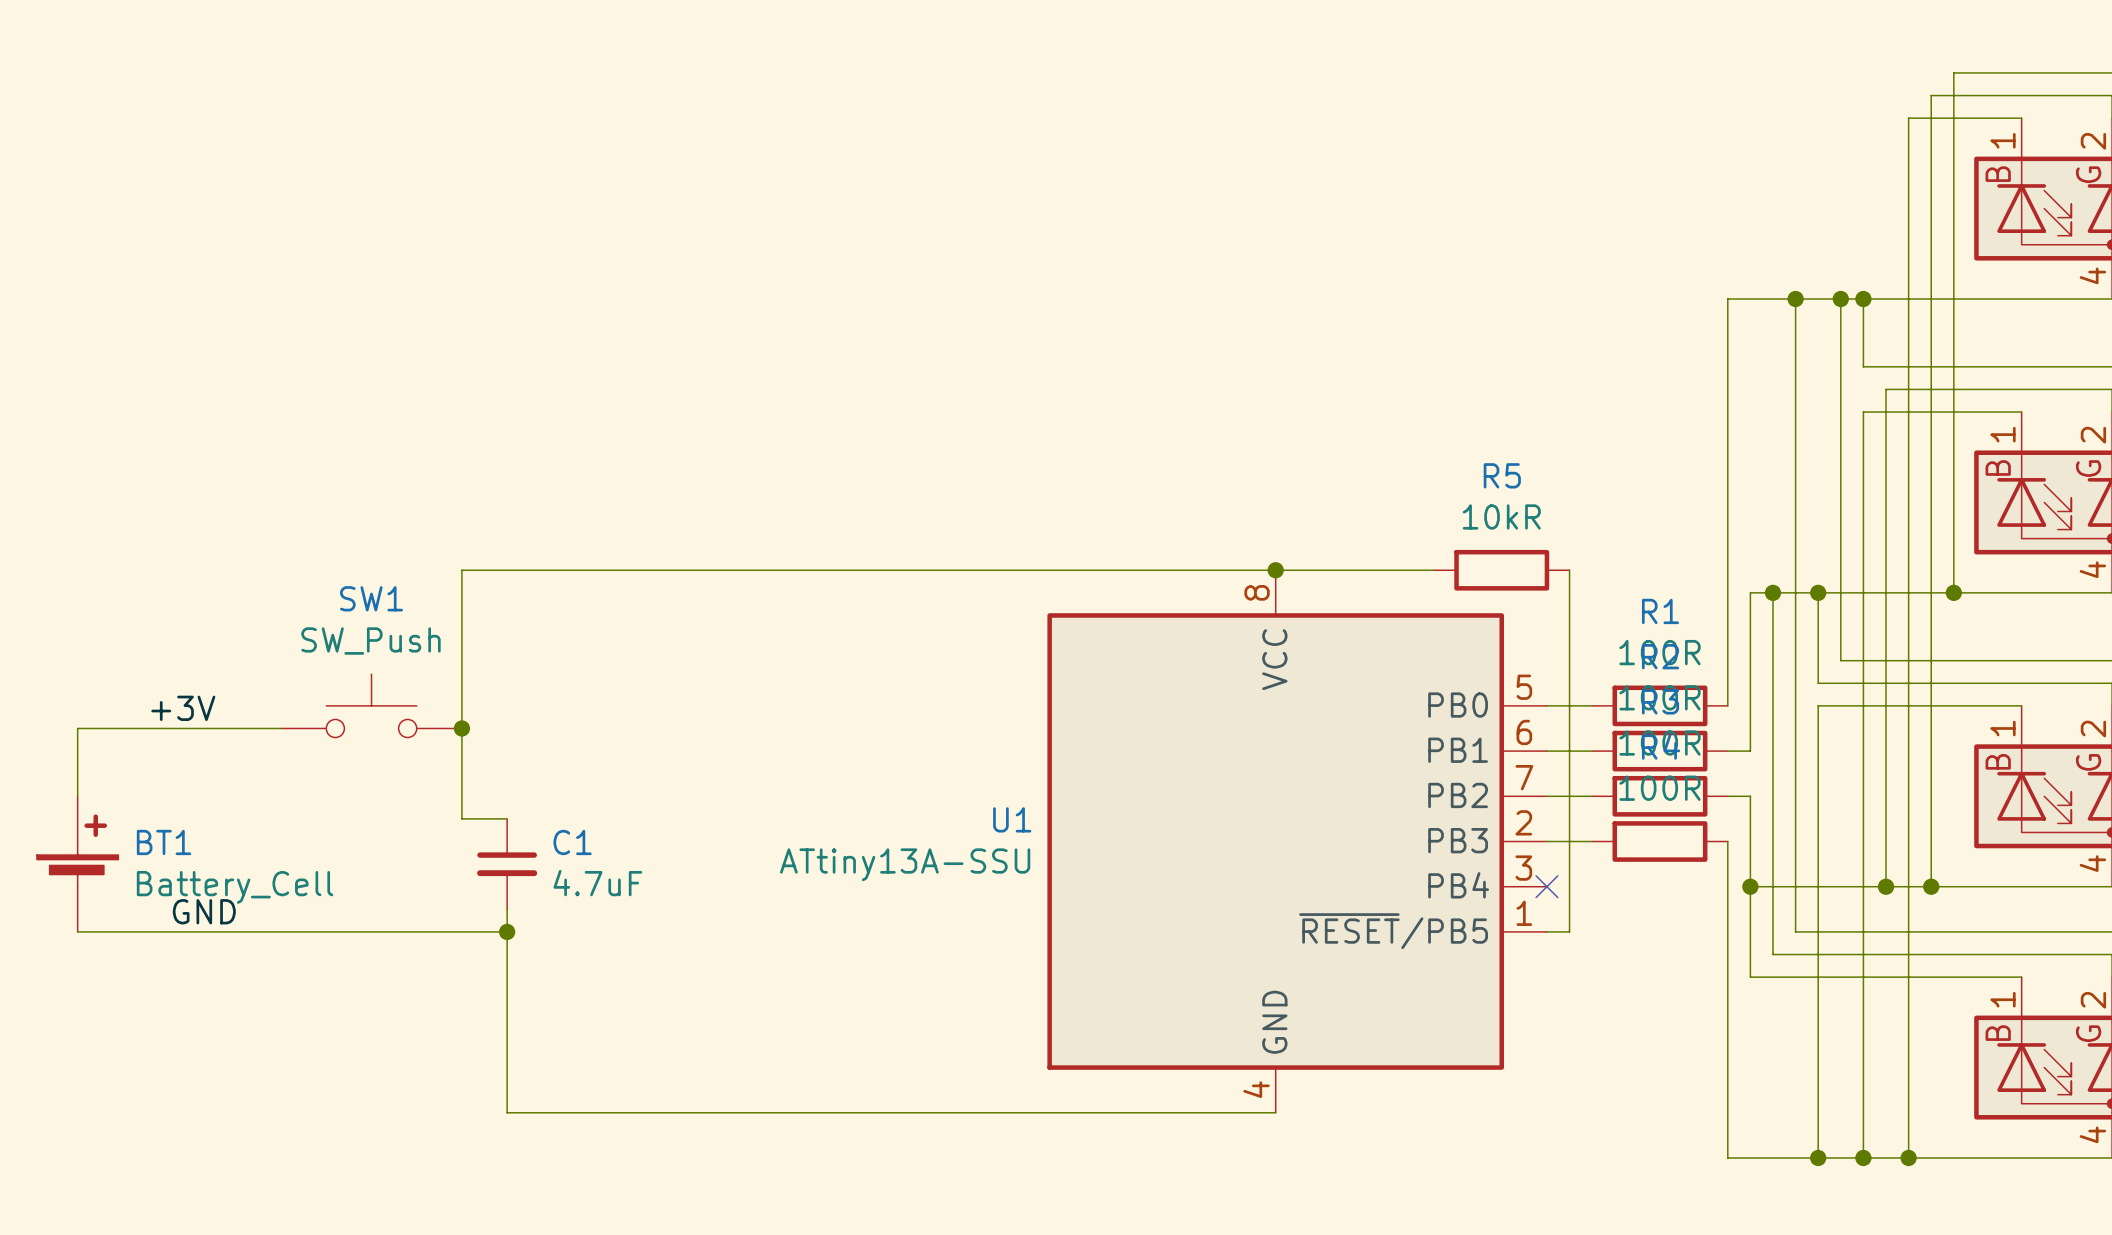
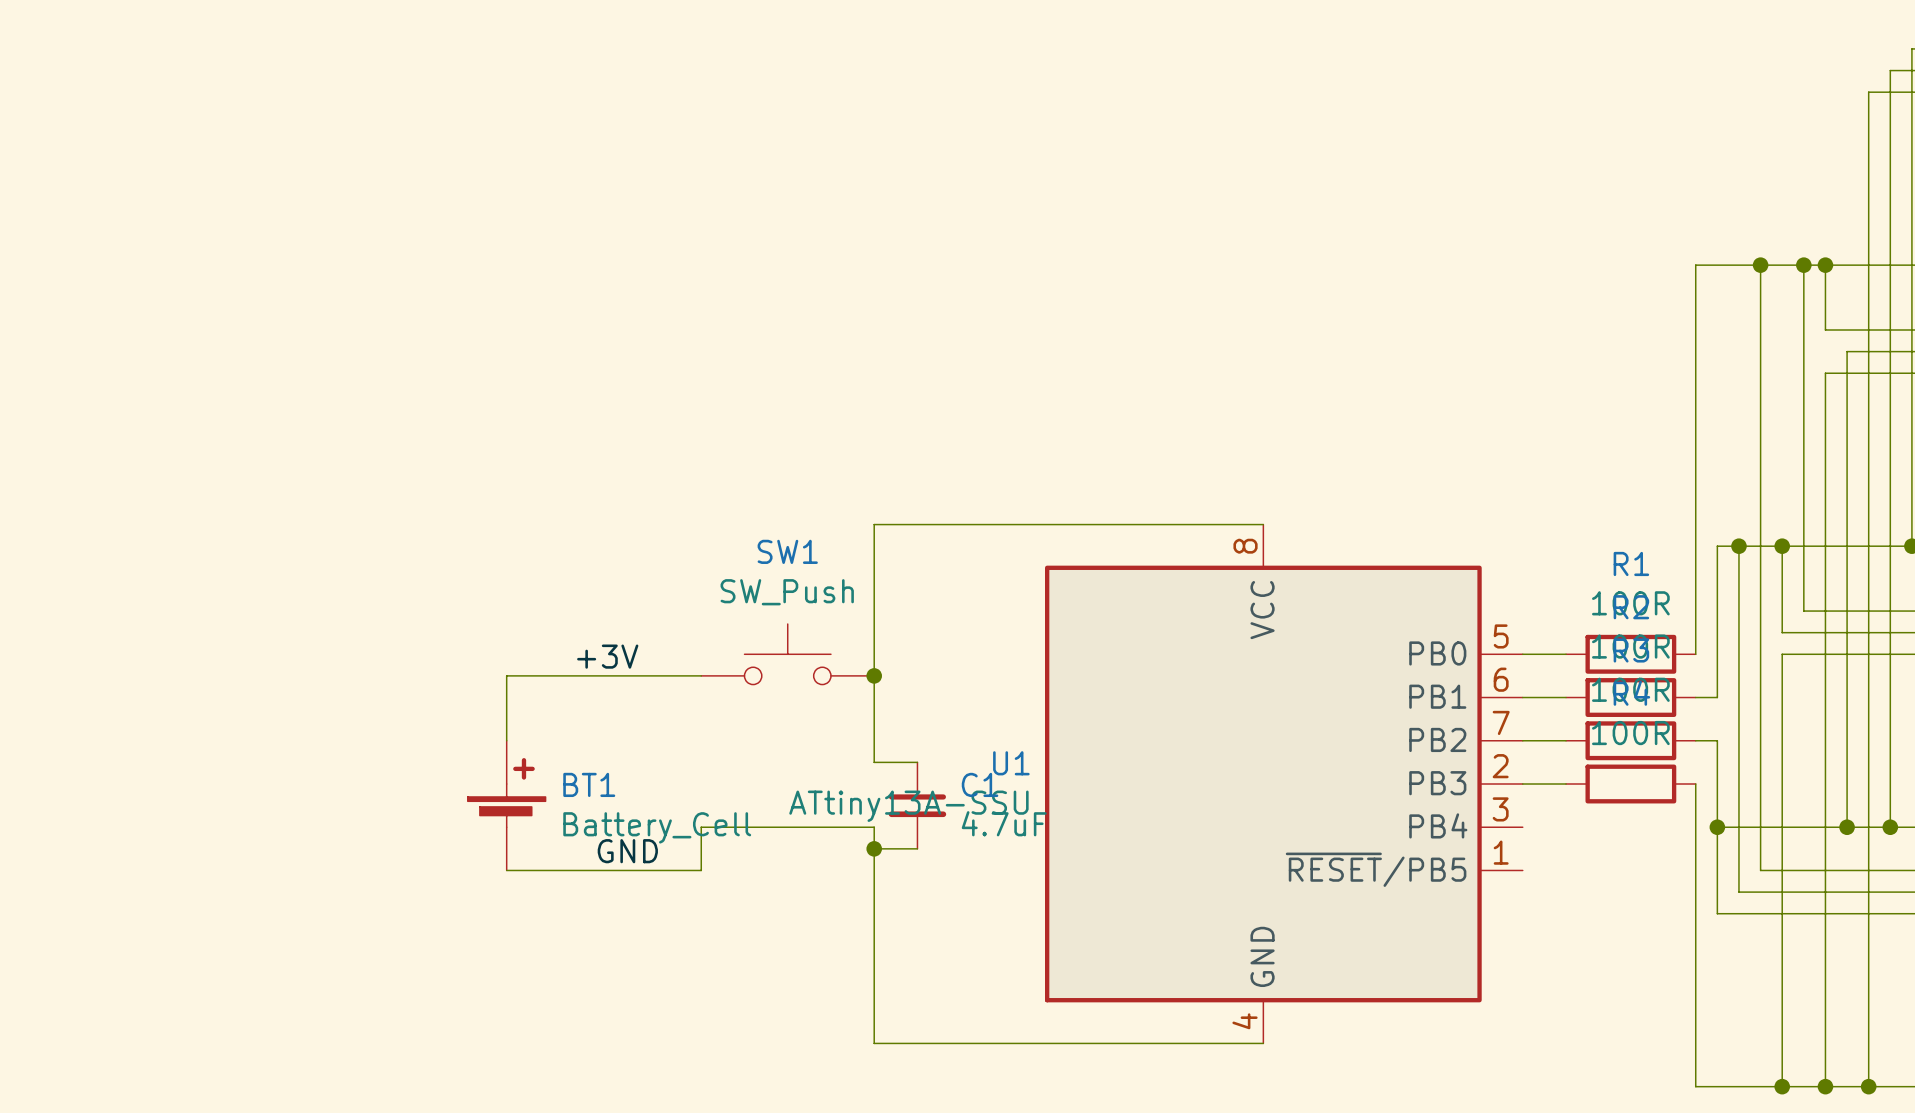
wire: (868, 570) (461, 570) (461, 818) (507, 818) -> (874, 524) (874, 762) (917, 762)
wire: (1275, 570) (1433, 570) -> none
junction: (1275, 570) -> none
R5: 10kR (1501, 570) -> none
wire: (1569, 570) (1569, 931) (1546, 931) -> none
SW1 position: (371, 705) -> (787, 654)
label position: +3V (183, 708) -> +3V (607, 656)
wire: (281, 728) (77, 728) (77, 796) -> (701, 675) (506, 675) (506, 740)
junction: (461, 728) -> none
junction: none -> (874, 675)
BT1 position: (77, 864) -> (506, 805)
C1 position: (507, 864) -> (917, 805)
no-connect mark: (1546, 886) -> none
wire: (507, 909) (507, 1112) (868, 1112) -> (528, 870) (701, 870) (701, 827) (874, 827) (874, 1043)
wire: none -> (874, 848) (917, 848)
junction: none -> (874, 848)
label position: GND (204, 911) -> GND (627, 851)
wire: (77, 931) (484, 931) -> none
junction: (507, 931) -> none

